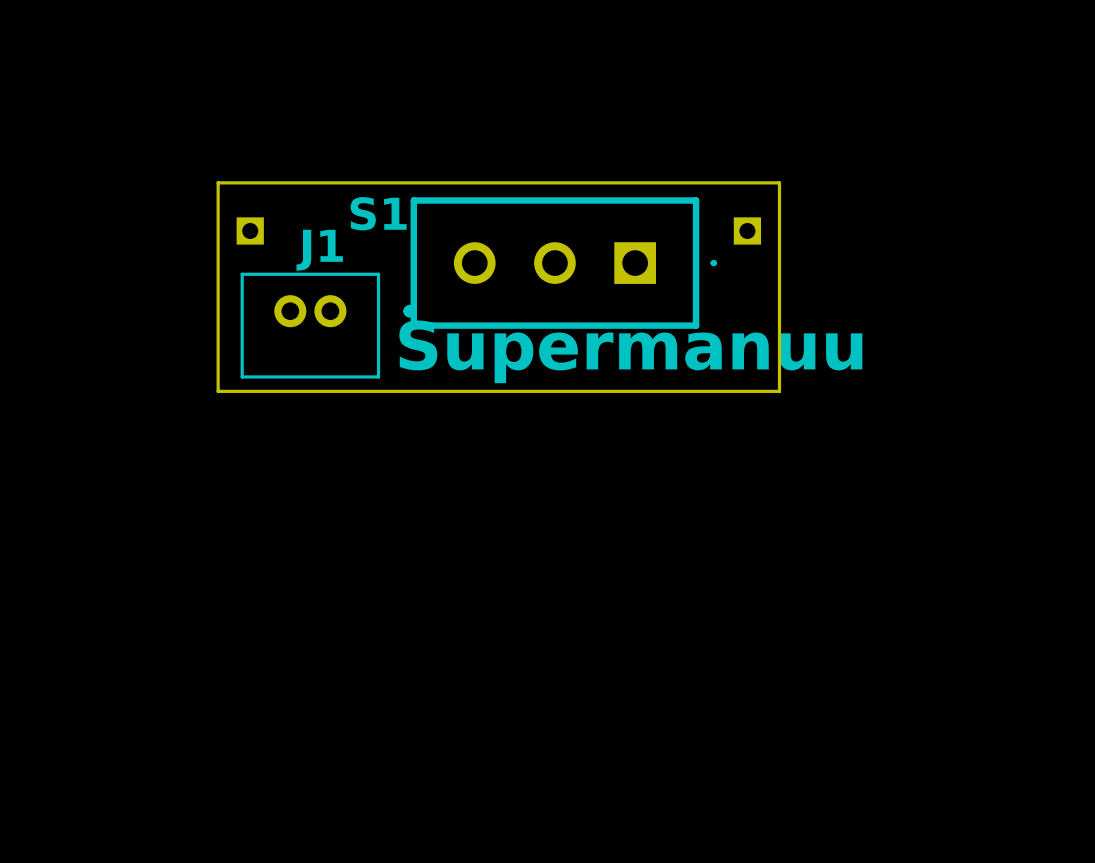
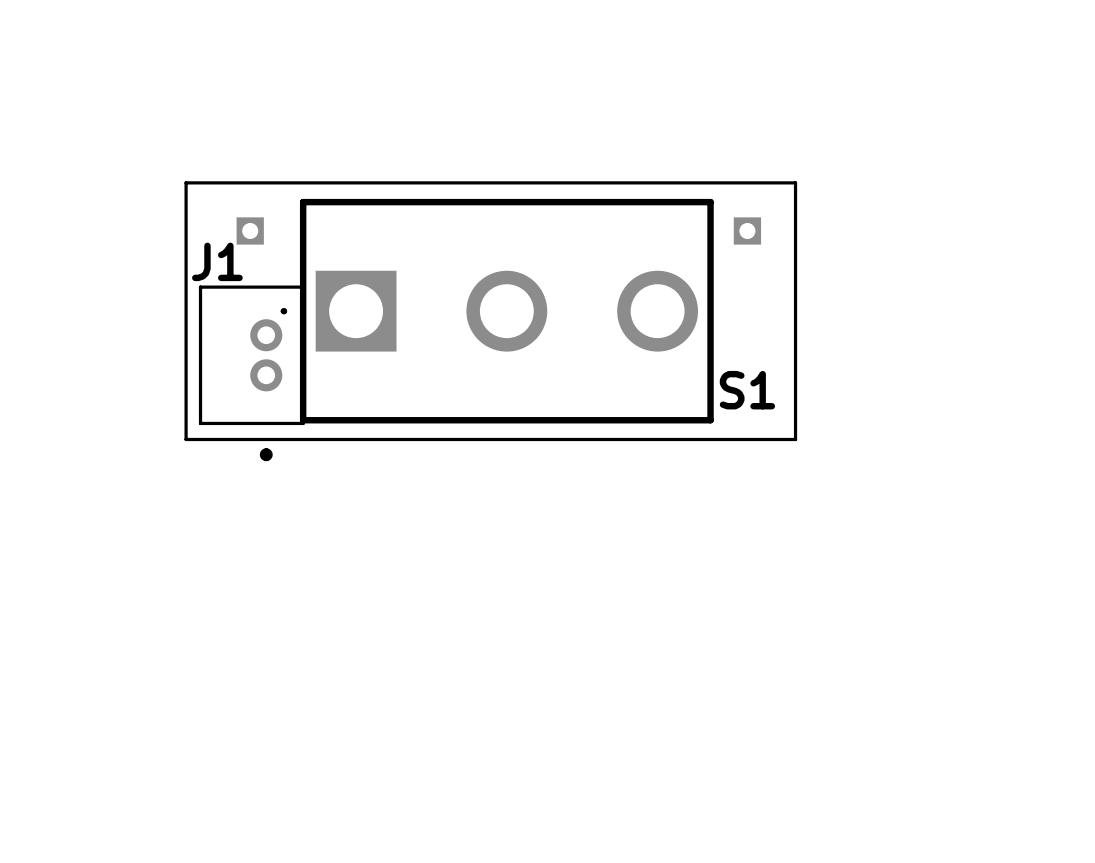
board edge: (218, 182) (218, 391) (779, 391) (779, 182) -> (218, 182) (186, 182) (186, 439) (795, 439) (795, 182) (779, 182)
S1 footprint: [410, 197, 717, 329] -> [280, 198, 714, 424]
S1 name position: S1 (378, 213) -> S1 (747, 390)
J1 rotation: 0° (328, 325) -> 90° clockwise (251, 373)
text: Supermanuu (630, 351) -> none

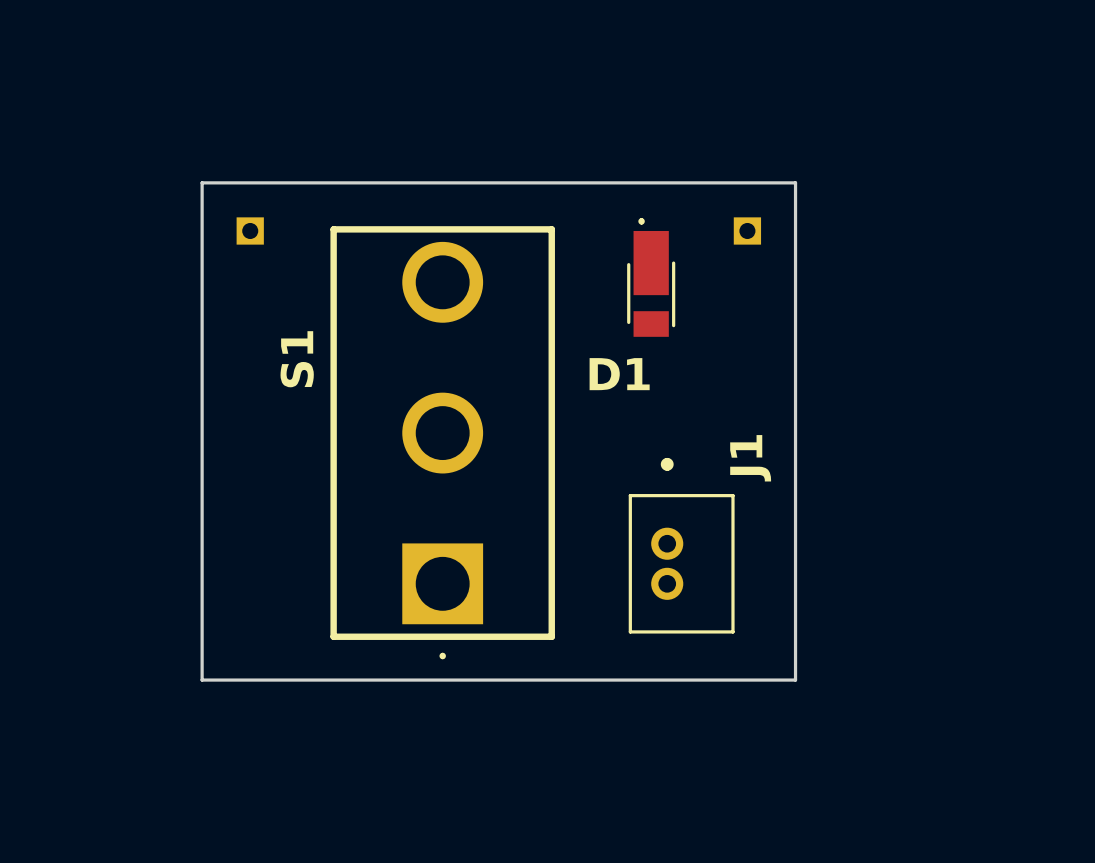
board edge: (202, 182) (186, 182) (186, 439) (795, 439) -> (202, 182) (202, 680) (795, 680) (795, 439)
J1 name position: J1 (217, 261) -> J1 (750, 458)
D1: none -> (651, 277)
S1 rotation: 0° (497, 311) -> 90° counterclockwise (442, 442)
J1 rotation: 0° (251, 373) -> 180° (681, 545)
J1 position: (251, 373) -> (681, 545)
S1 name position: S1 (747, 390) -> S1 (297, 359)

